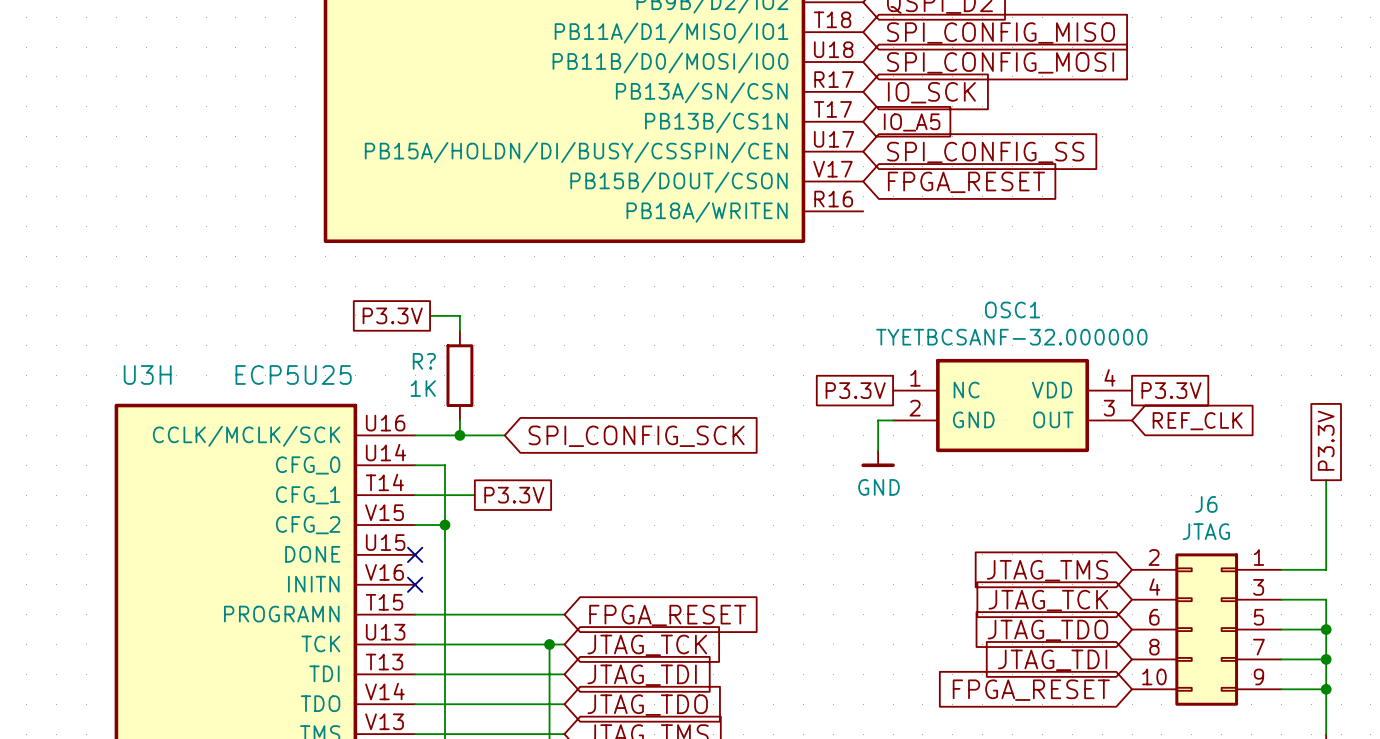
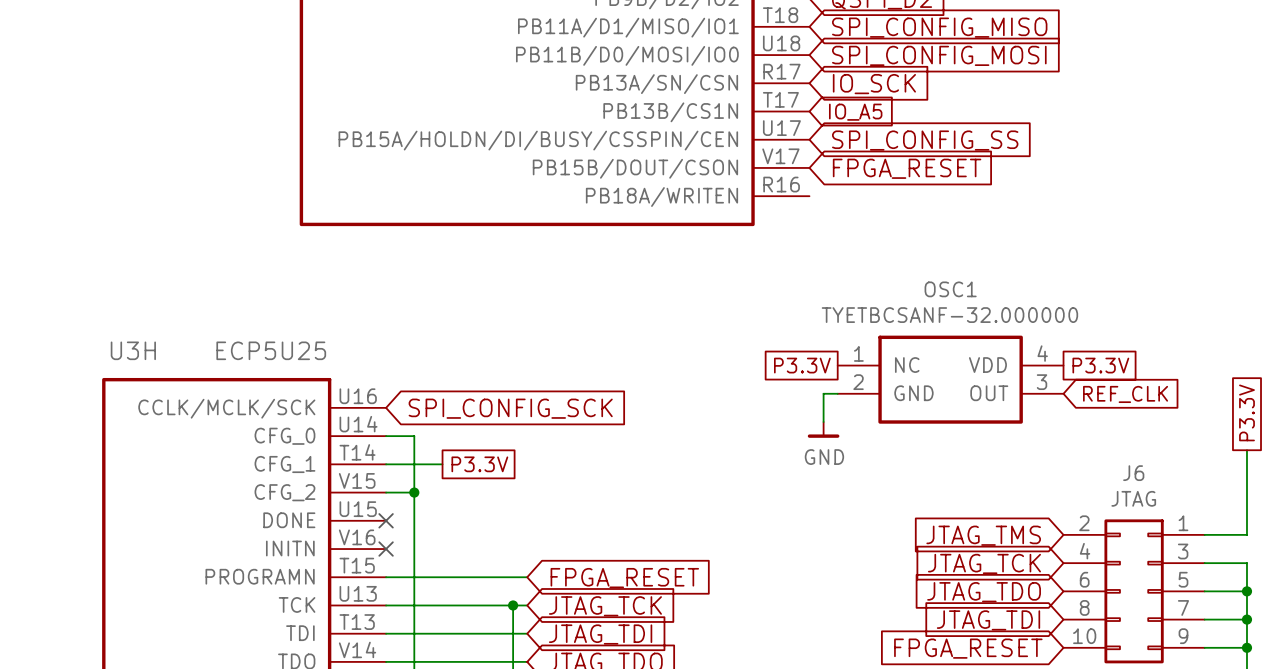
global label: P3.3V (392, 315) -> none
wire: (430, 315) (459, 315) (459, 330) -> none
R?: 1K (459, 375) -> none
wire: (459, 420) (459, 435) -> none
wire: (415, 435) (504, 435) -> none
junction: (459, 435) -> none
global label position: SPI_CONFIG_SCK (636, 436) -> SPI_CONFIG_SCK (510, 408)

